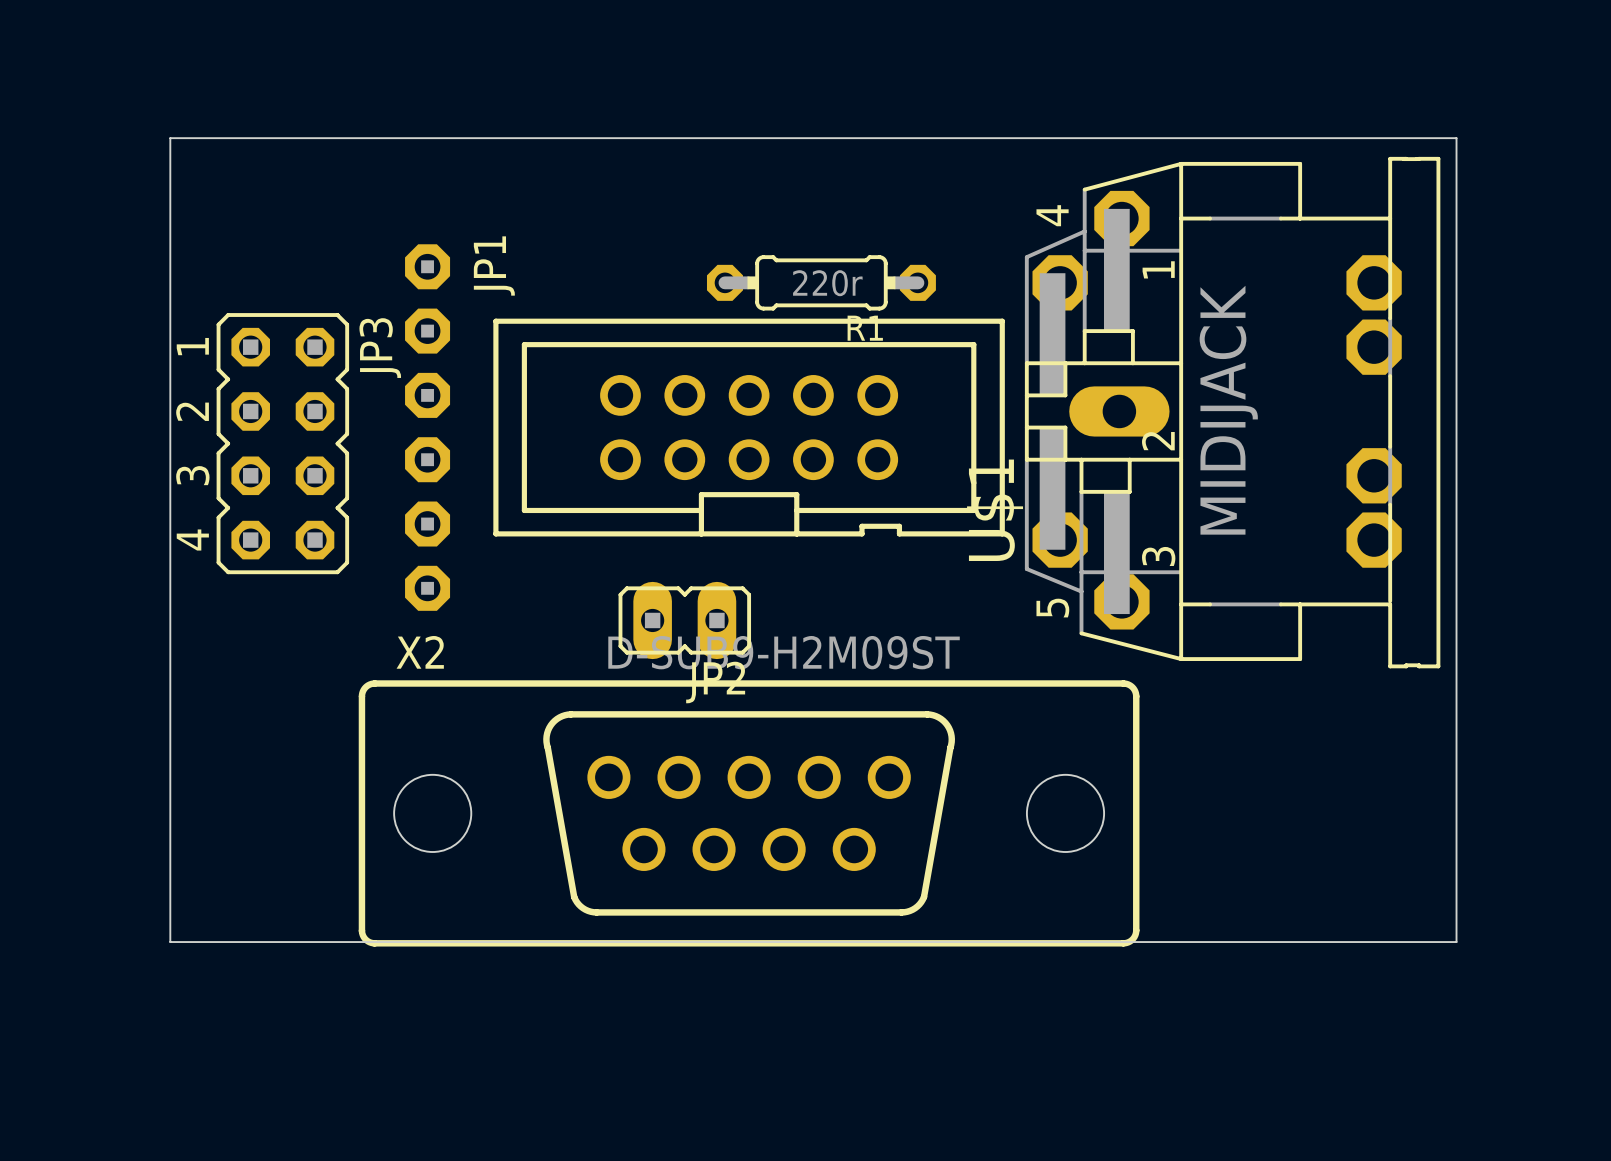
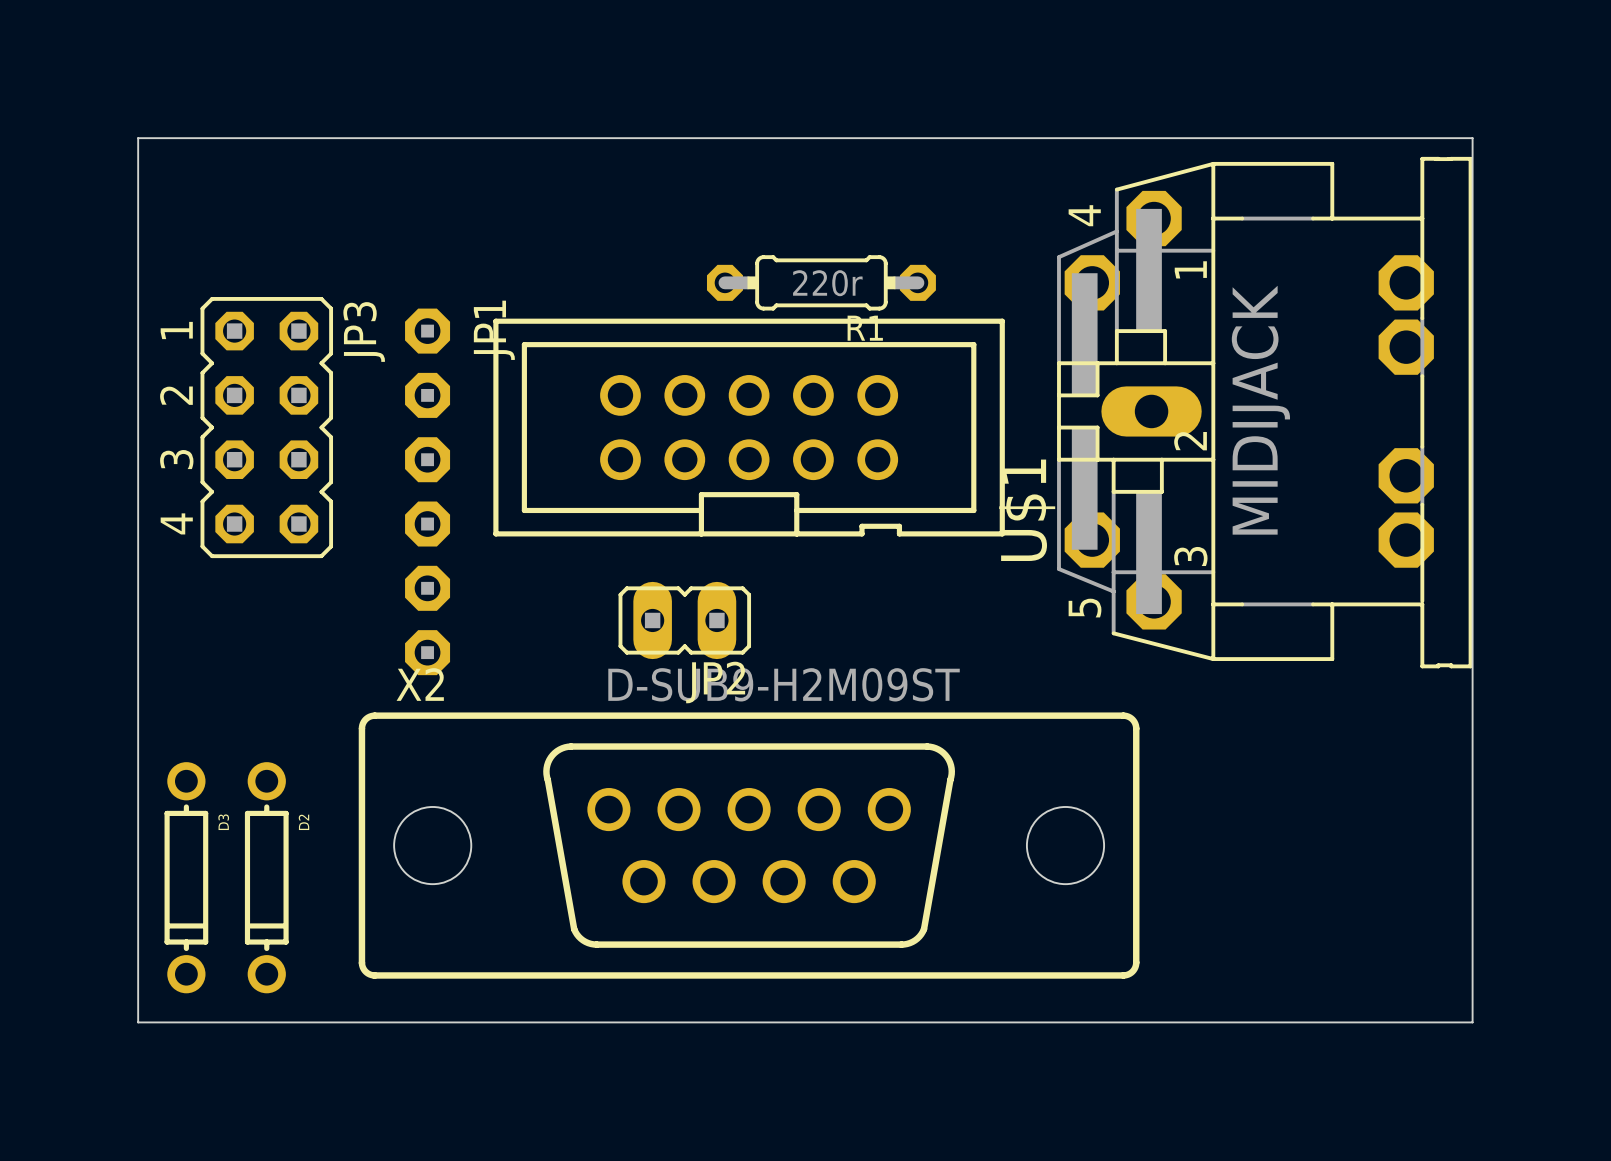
board edge: (170, 138) (170, 942) (1456, 942) (1456, 138) -> (170, 138) (138, 138) (138, 1022) (1472, 1022) (1472, 138) (1456, 138)
U$1 position: (1232, 412) -> (1264, 412)
JP1 position: (427, 427) -> (427, 491)
JP3 position: (282, 443) -> (266, 427)
X2 position: (749, 813) -> (749, 845)
D3: none -> (186, 877)
D2: none -> (266, 877)

